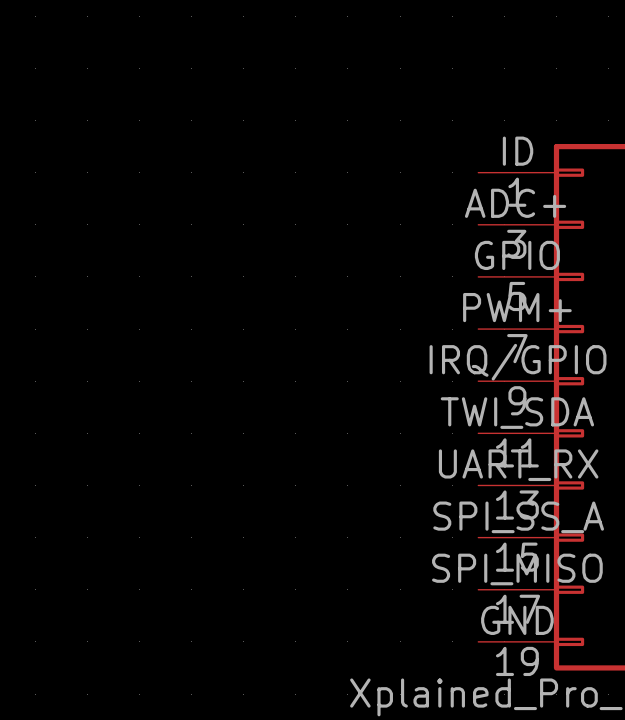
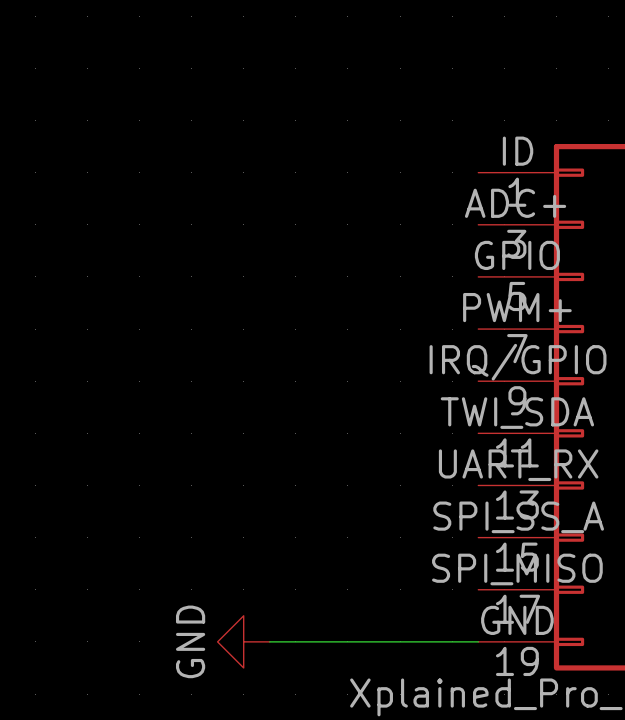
power symbol: none -> GND (243, 641)
wire: none -> (269, 641) (478, 641)

